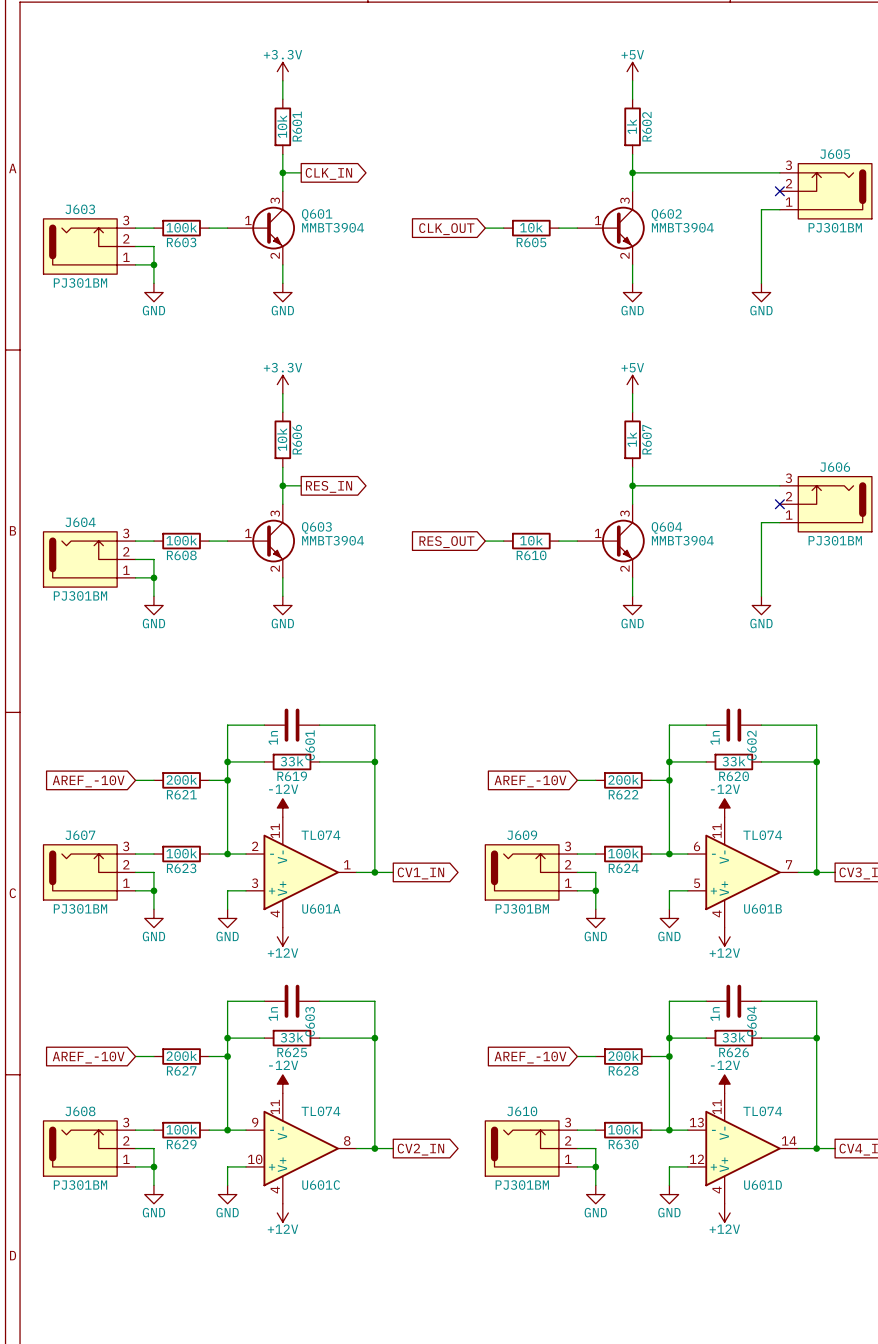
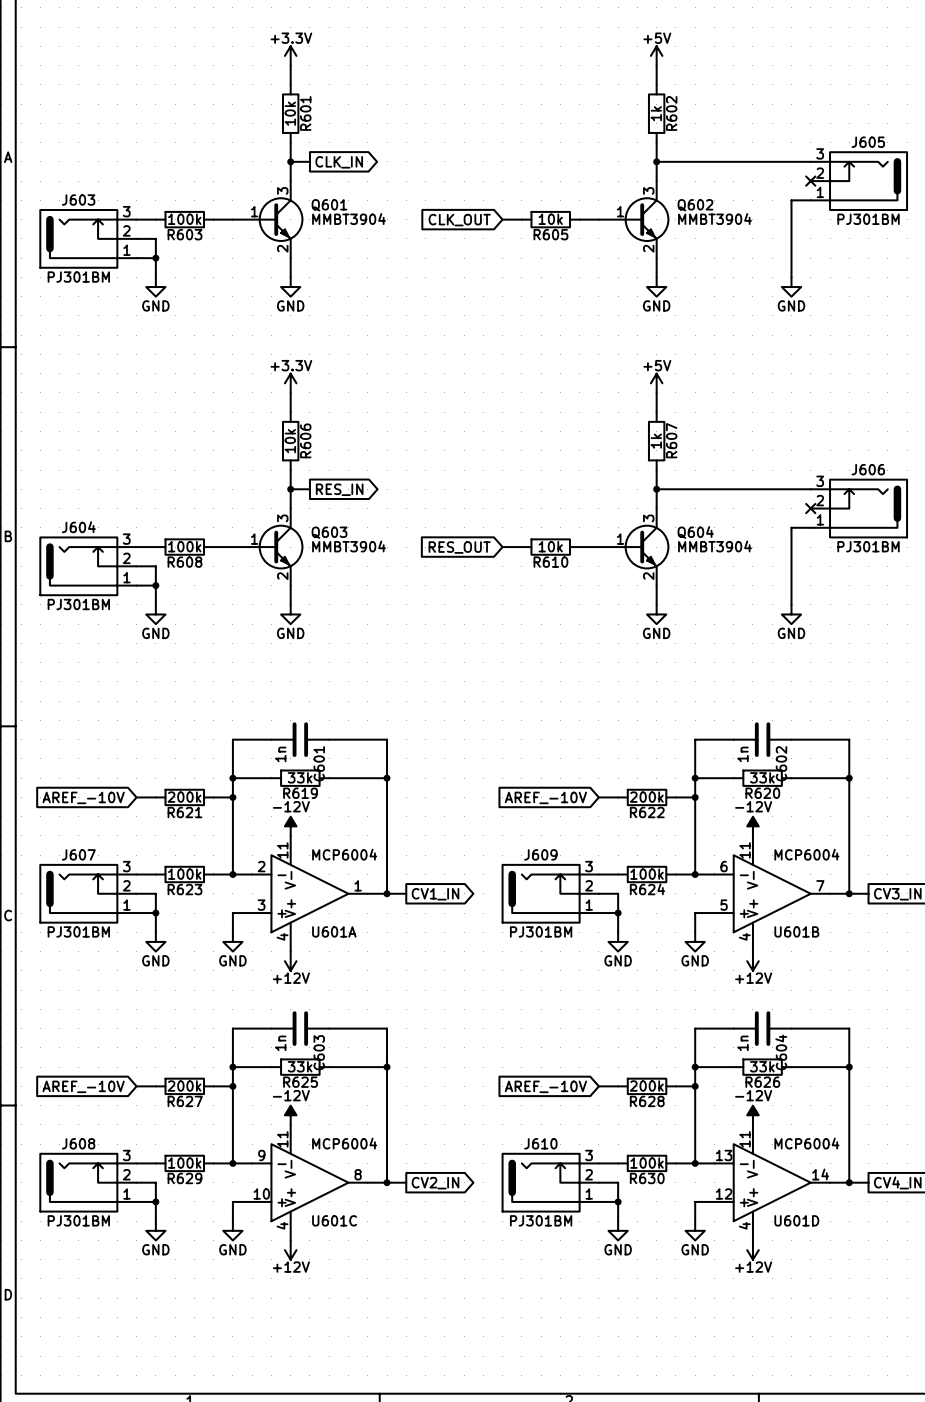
U601A value: TL074 (320, 835) -> MCP6004 (344, 854)
U601B value: TL074 (762, 835) -> MCP6004 (806, 854)
U601C value: TL074 (320, 1111) -> MCP6004 (344, 1143)
U601D value: TL074 (762, 1111) -> MCP6004 (806, 1143)

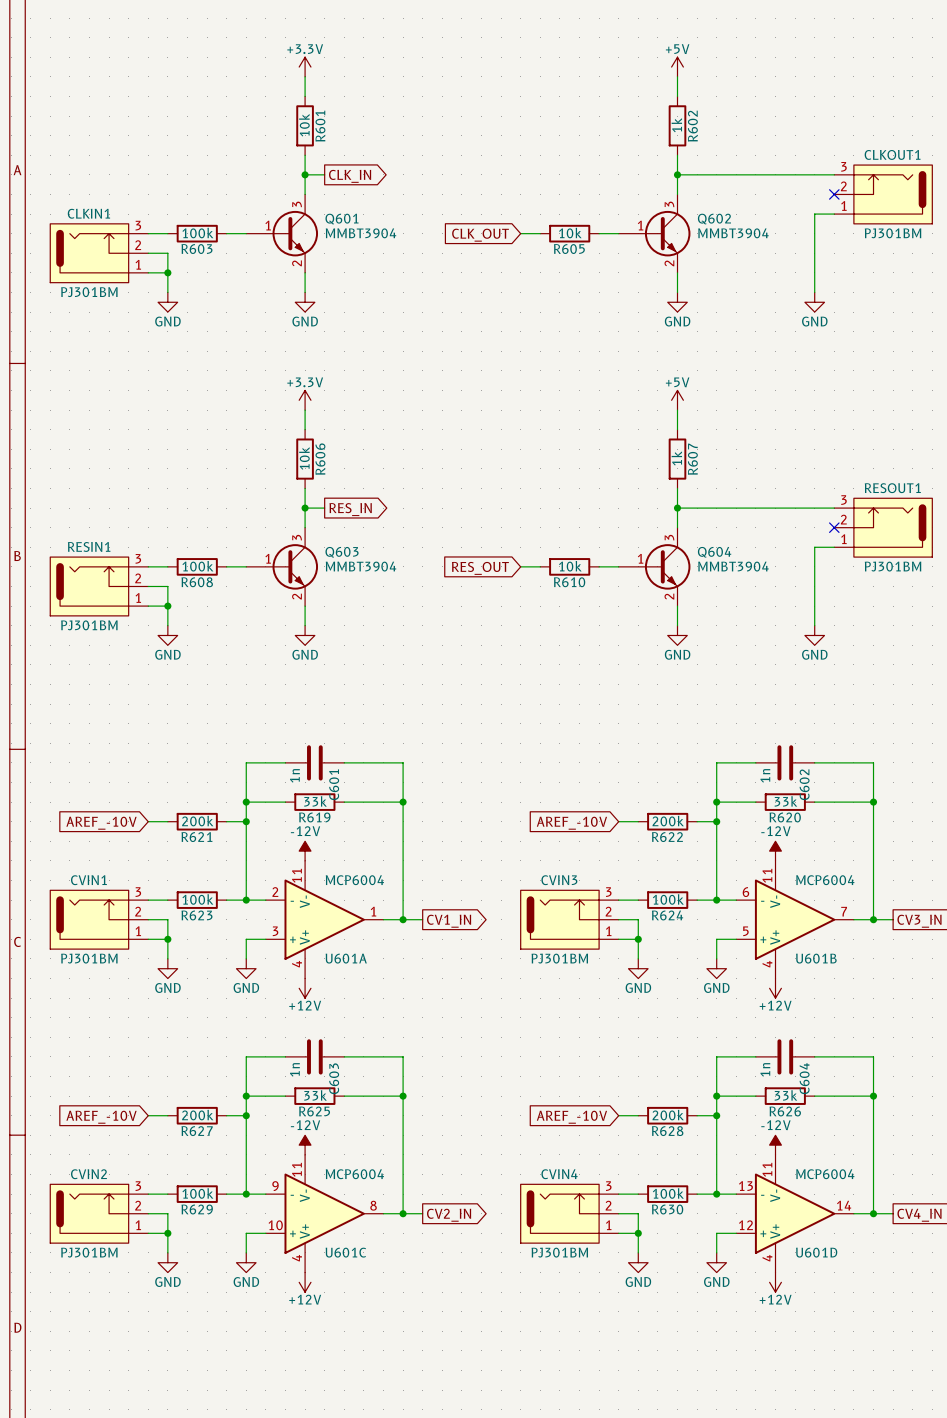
J605 name: J605 (868, 142) -> CLKOUT1 (892, 154)
J603 name: J603 (78, 200) -> CLKIN1 (88, 213)
J606 name: J606 (868, 469) -> RESOUT1 (892, 488)
J604 name: J604 (78, 527) -> RESIN1 (89, 546)
J607 name: J607 (78, 854) -> CVIN1 (88, 880)
J609 name: J609 (540, 854) -> CVIN3 (559, 880)
J608 name: J608 (78, 1143) -> CVIN2 (88, 1174)
J610 name: J610 (540, 1143) -> CVIN4 (559, 1174)

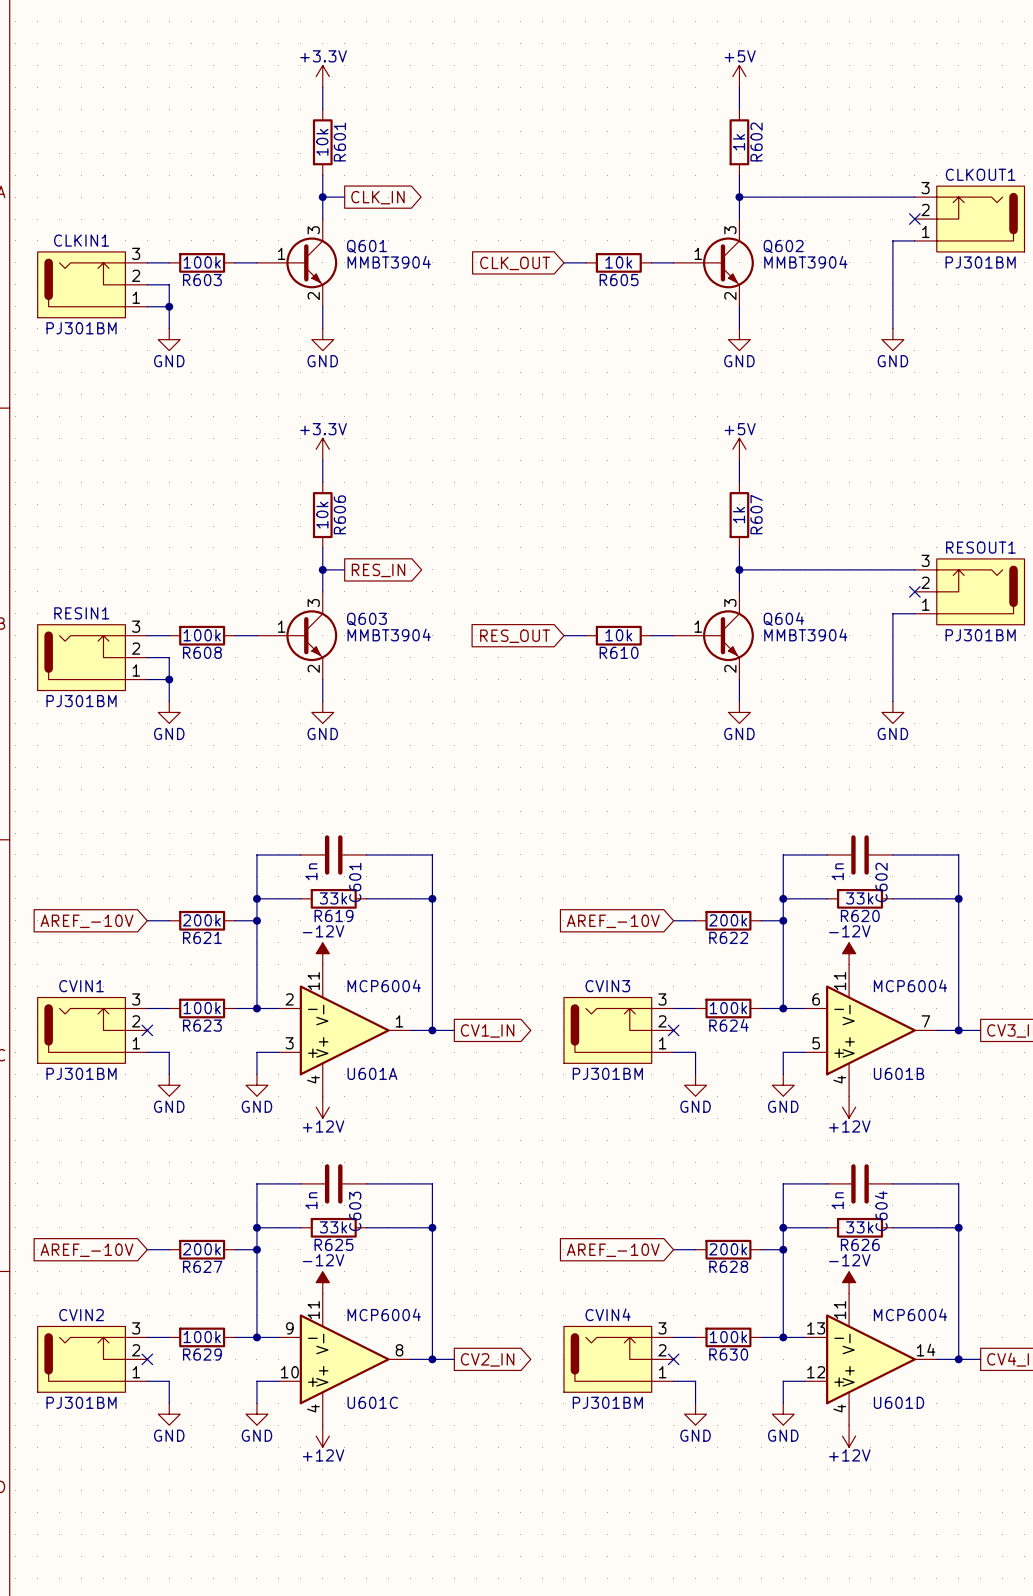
wire: (148, 919) (167, 919) (167, 939) -> none
no-connect mark: none -> (147, 1030)
wire: (618, 919) (638, 919) (638, 939) -> none
no-connect mark: none -> (673, 1030)
junction: (167, 939) -> none
junction: (638, 939) -> none
wire: (148, 1213) (167, 1213) (167, 1233) -> none
no-connect mark: none -> (147, 1359)
wire: (618, 1213) (638, 1213) (638, 1233) -> none
no-connect mark: none -> (673, 1359)
junction: (167, 1233) -> none
junction: (638, 1233) -> none

